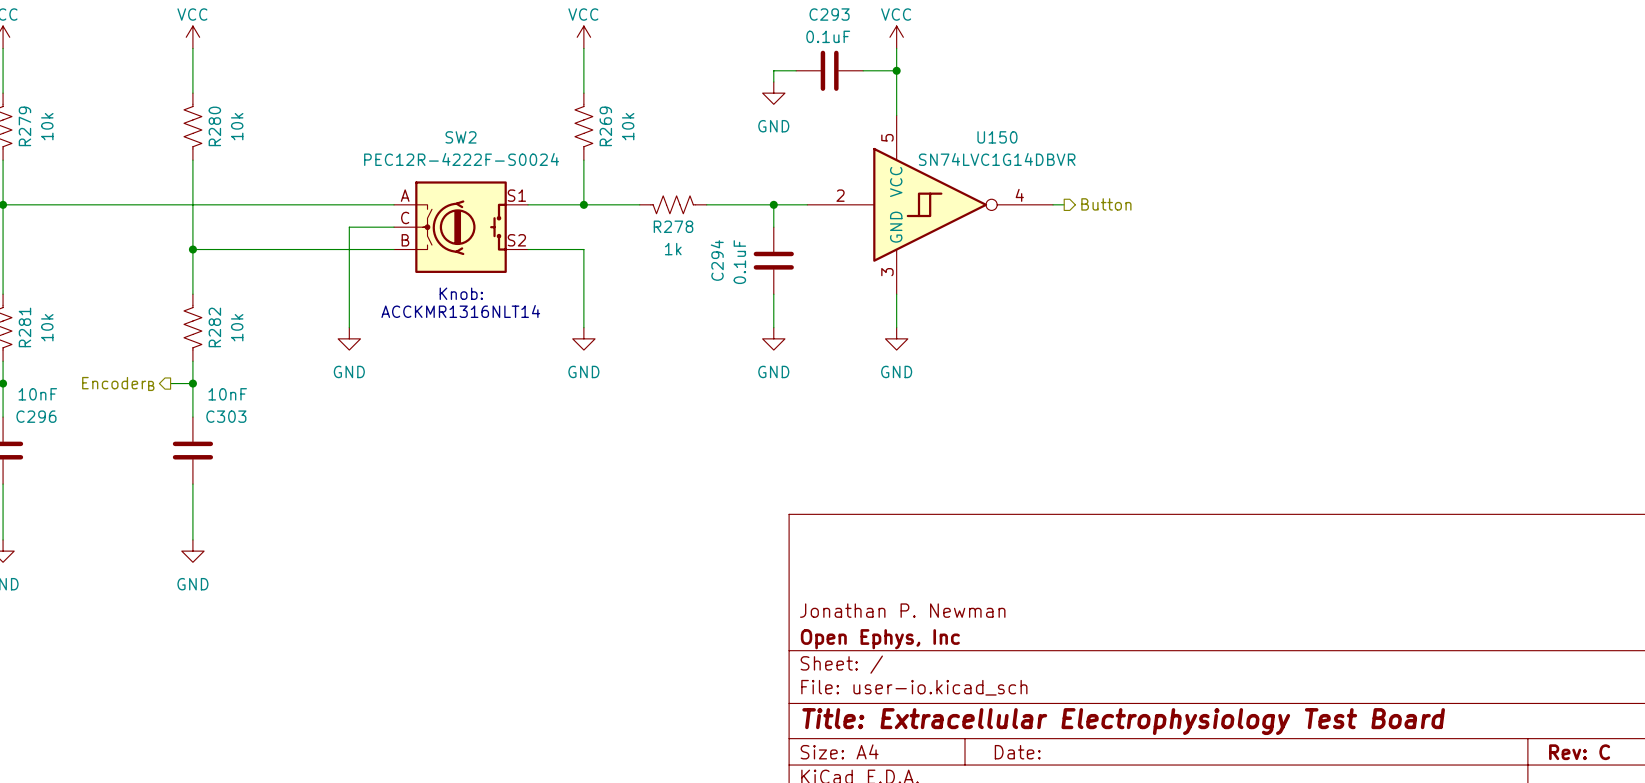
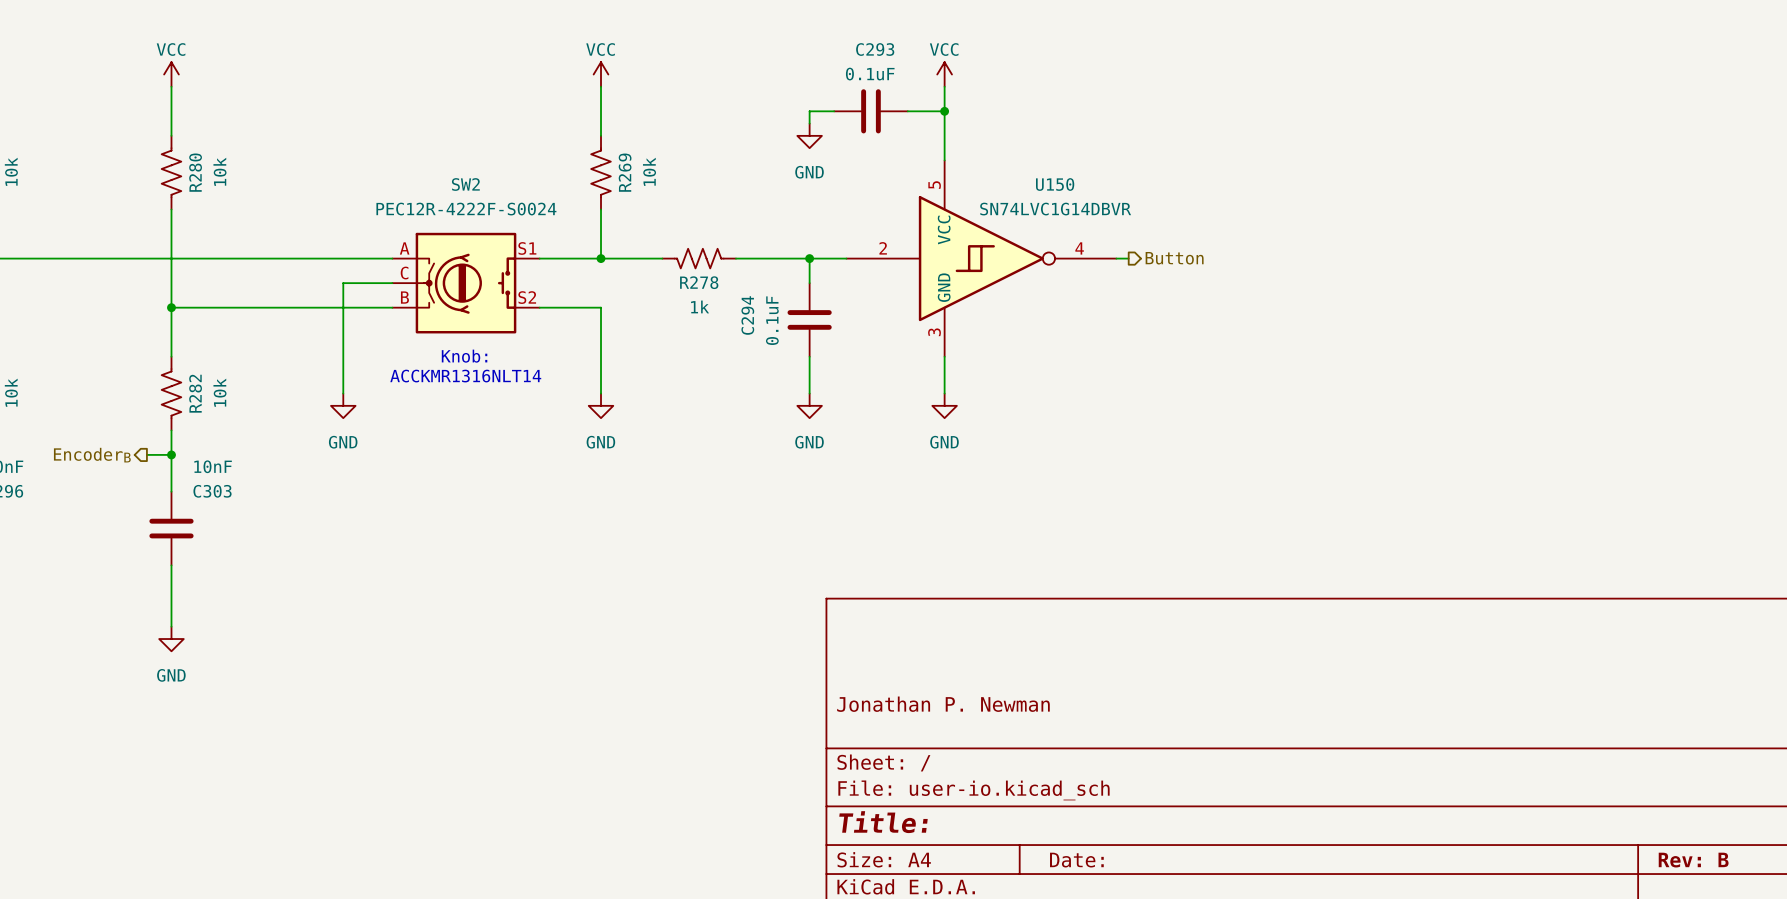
title block: Open Ephys, Inc (880, 639) -> none
title block: Title: Extracellular Electrophysiology Test Board (1123, 721) -> Title: (883, 822)
title block: Rev: C (1579, 752) -> Rev: B (1693, 860)

